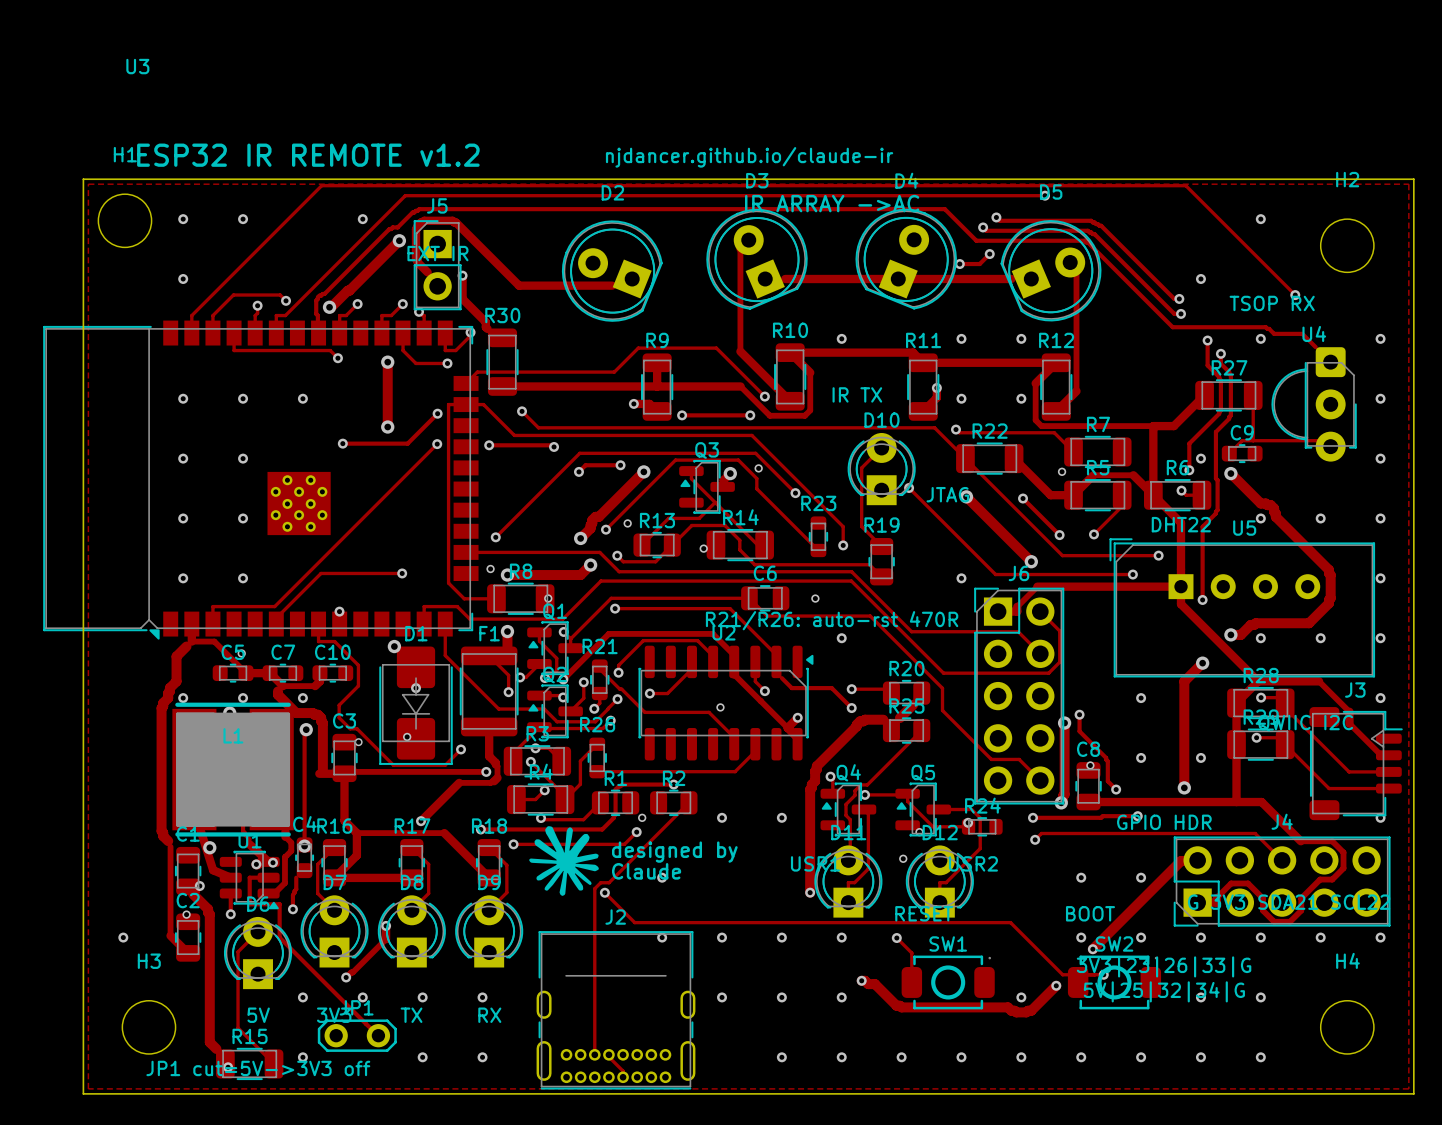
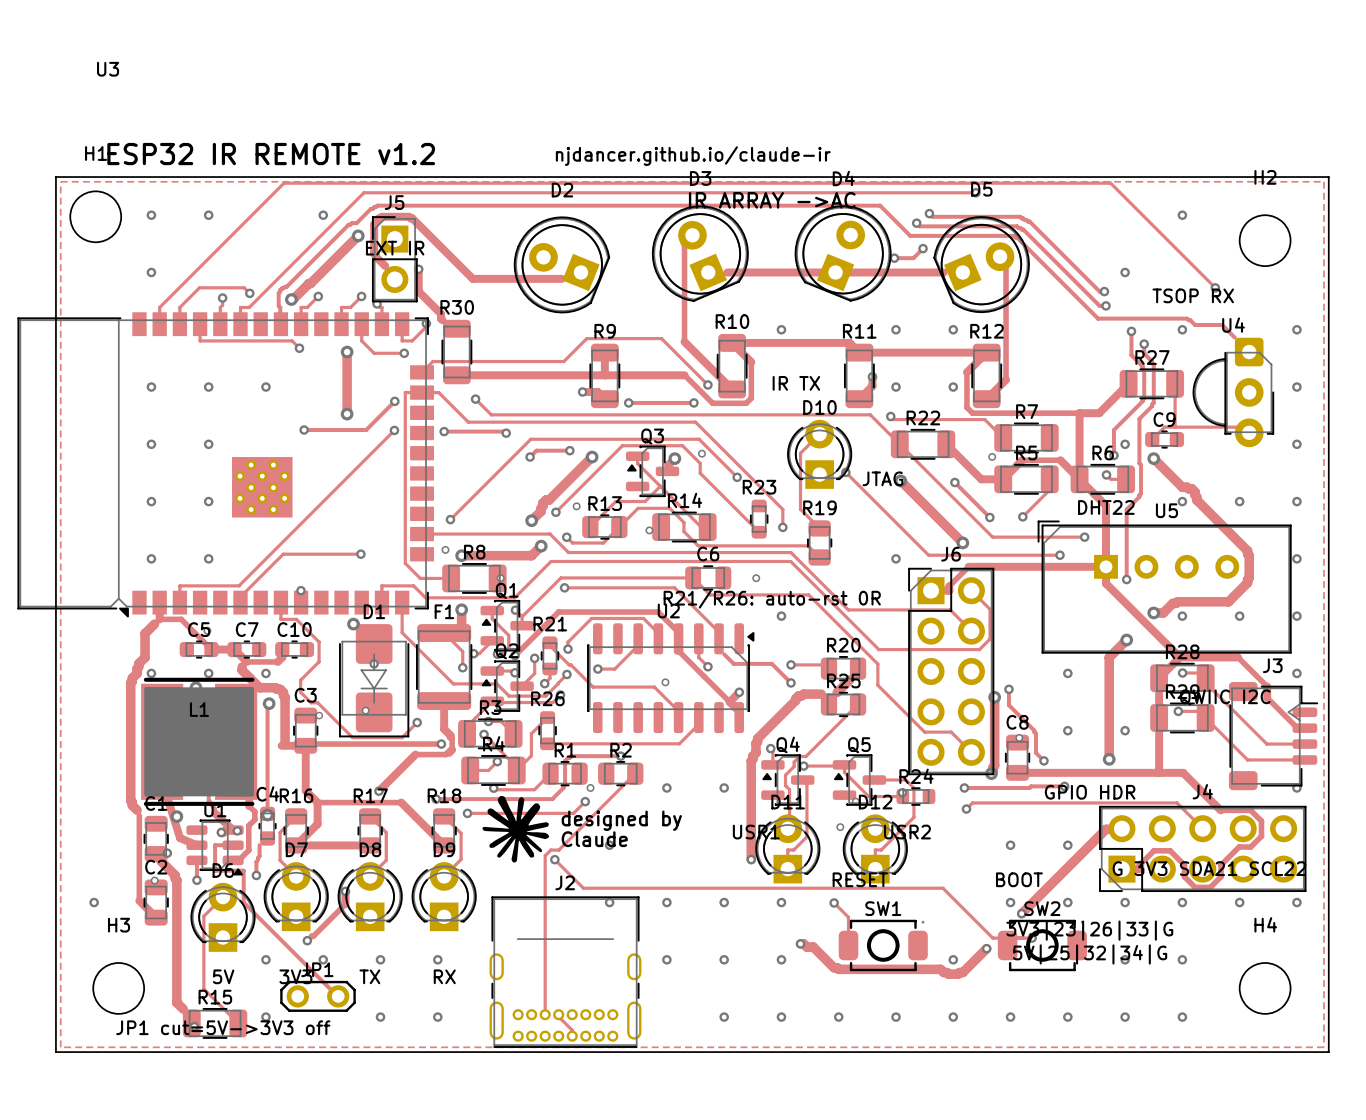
text: R21/R26: auto-rst 470R (832, 620) -> R21/R26: auto-rst 0R (772, 599)

